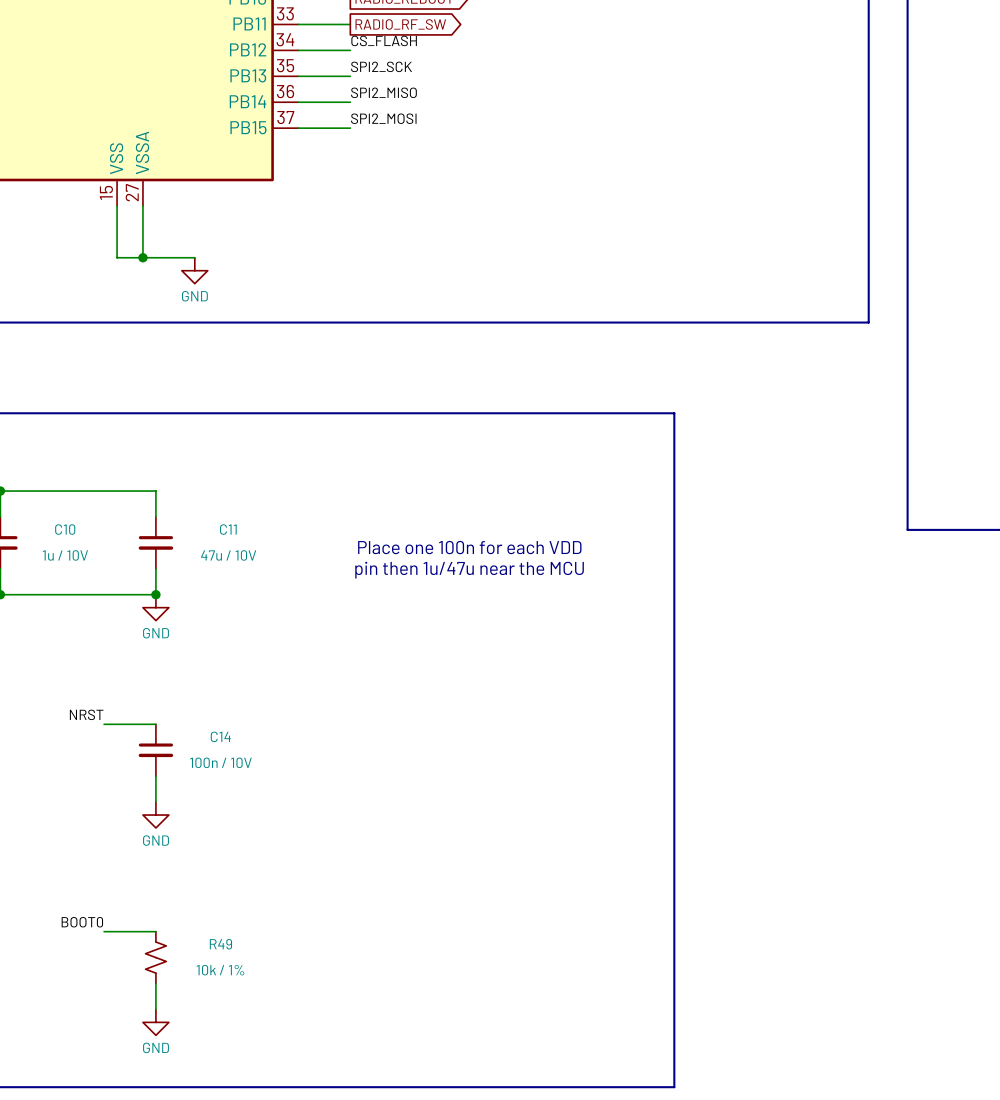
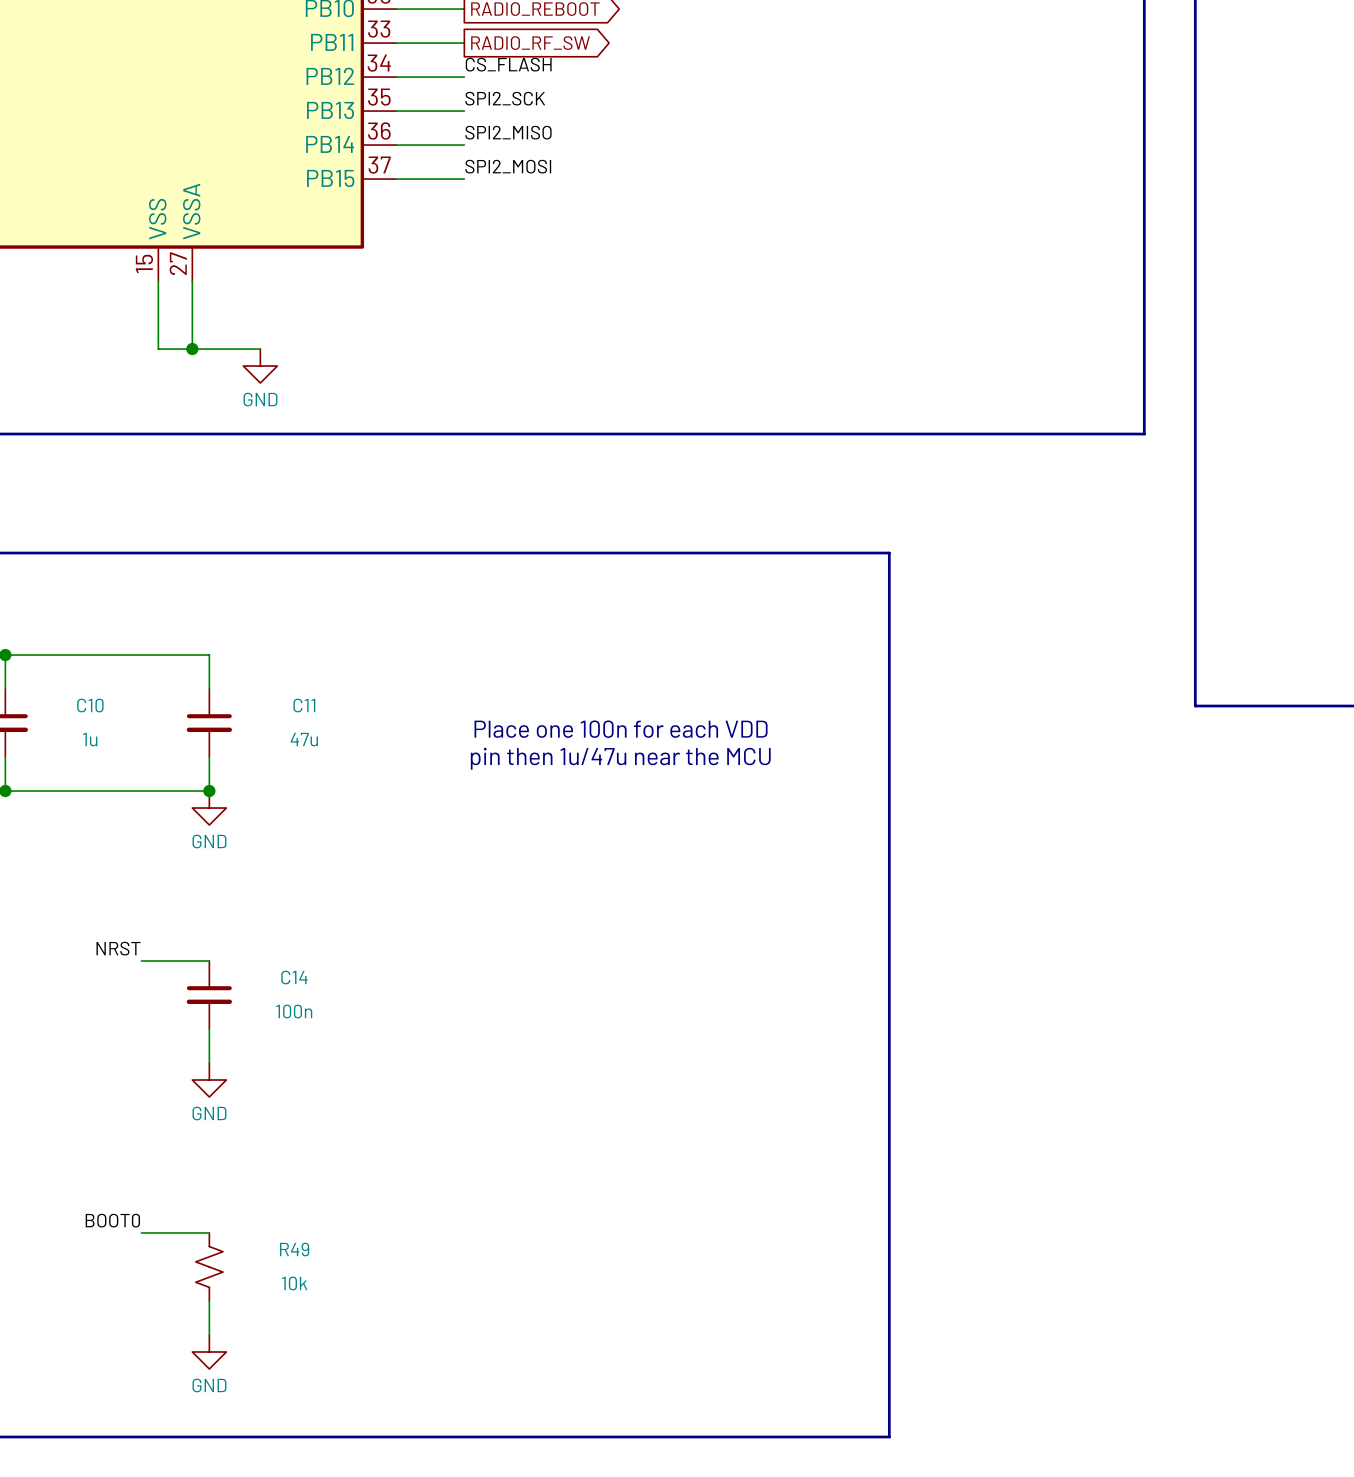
C10 value: 1u / 10V (65, 555) -> 1u (90, 739)
C11 value: 47u / 10V (228, 555) -> 47u (304, 739)
C14 value: 100n / 10V (220, 762) -> 100n (294, 1011)
R49 value: 10k / 1% (220, 970) -> 10k (294, 1283)

